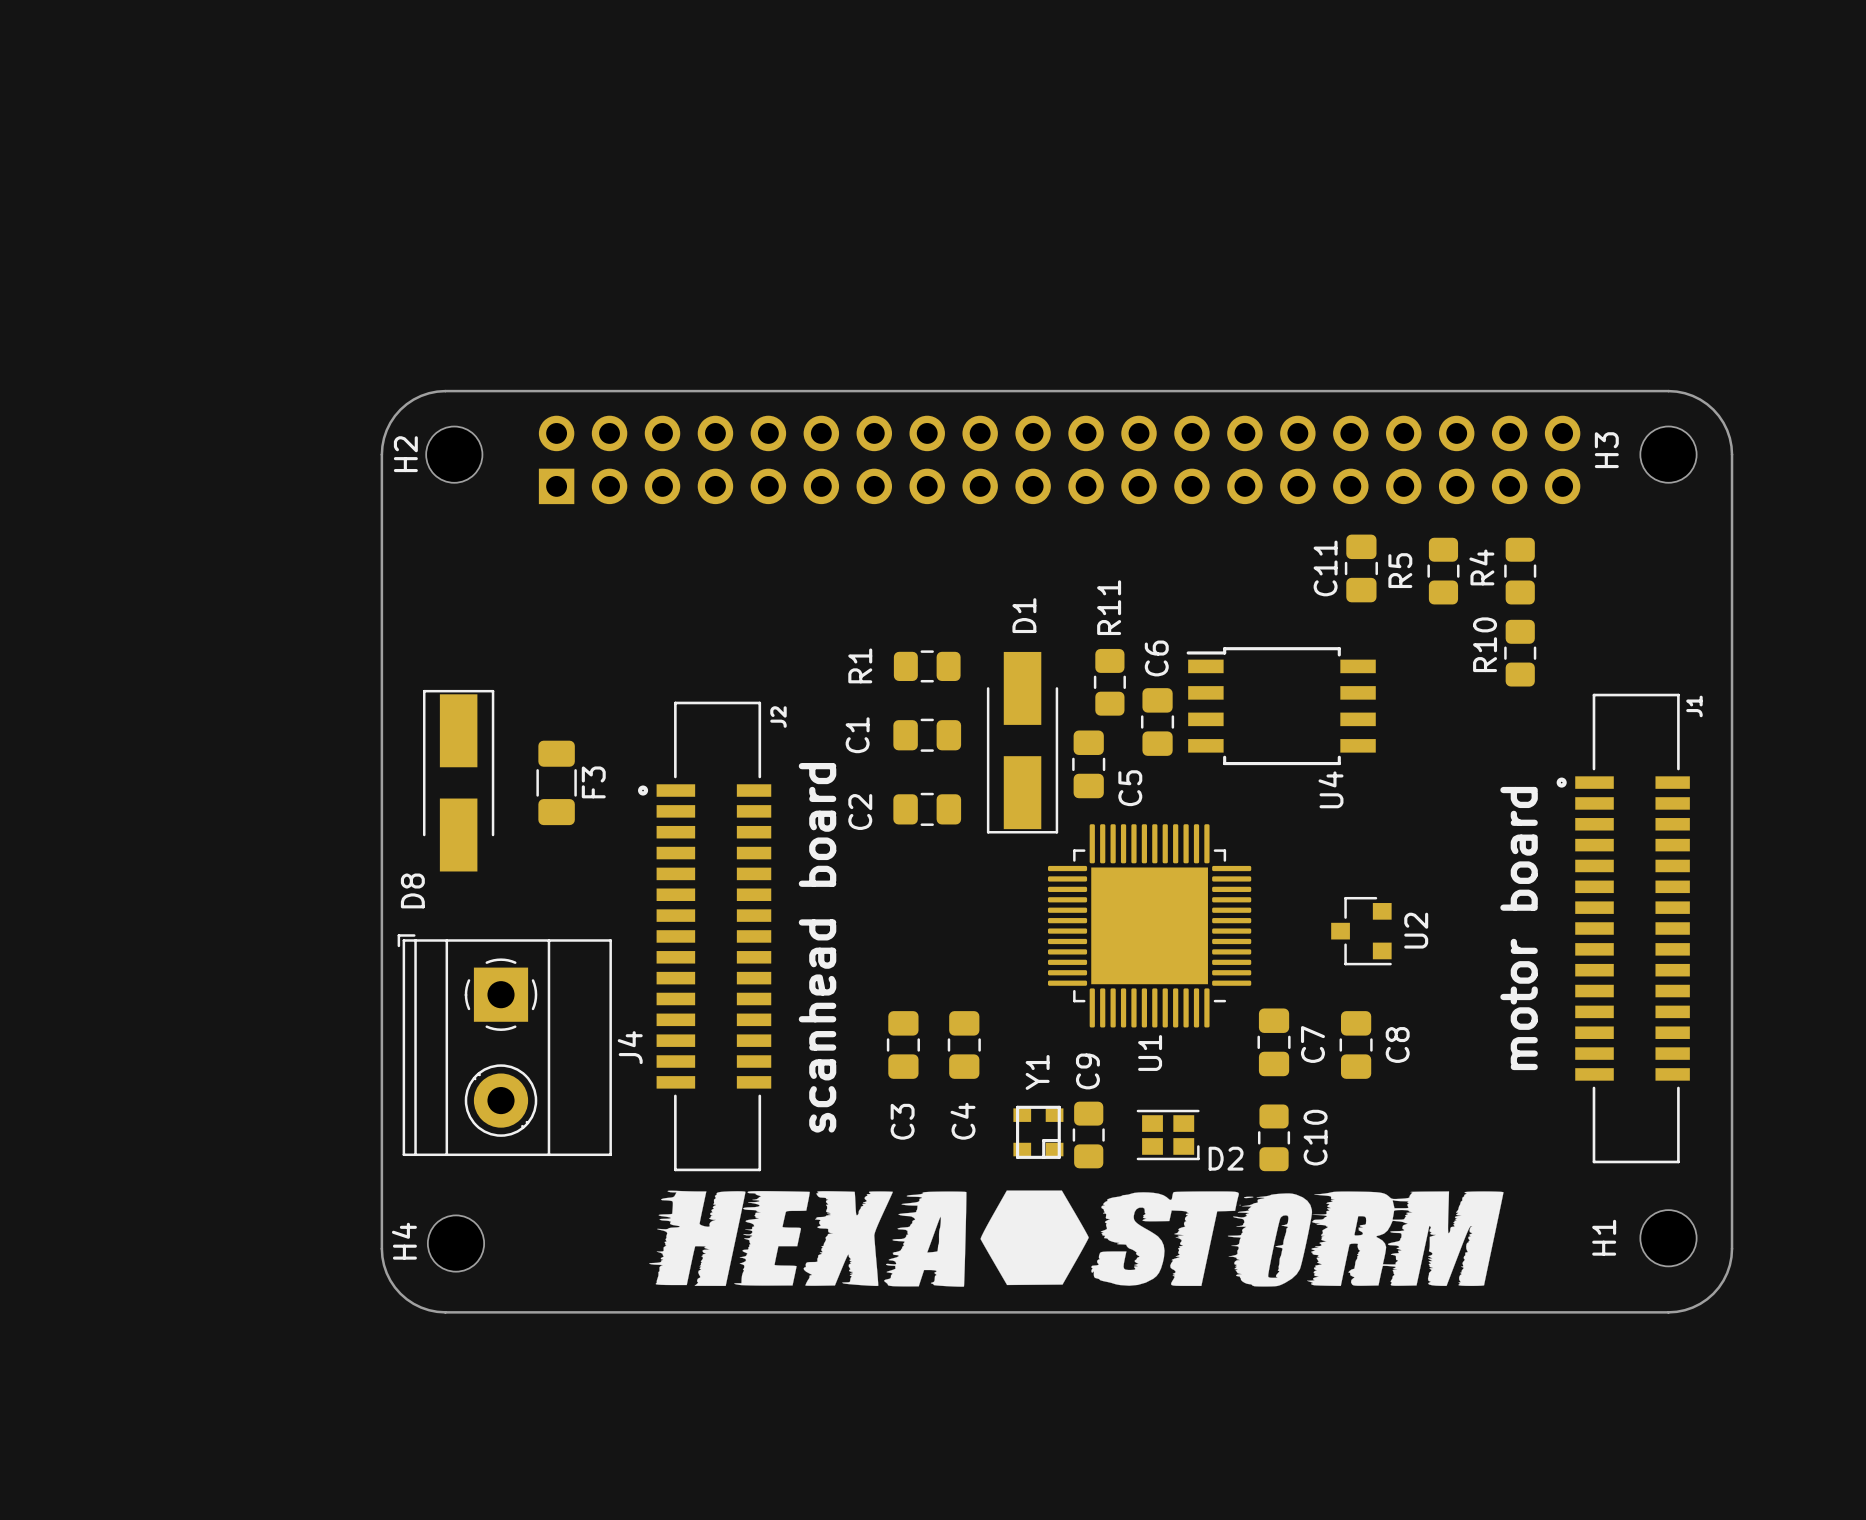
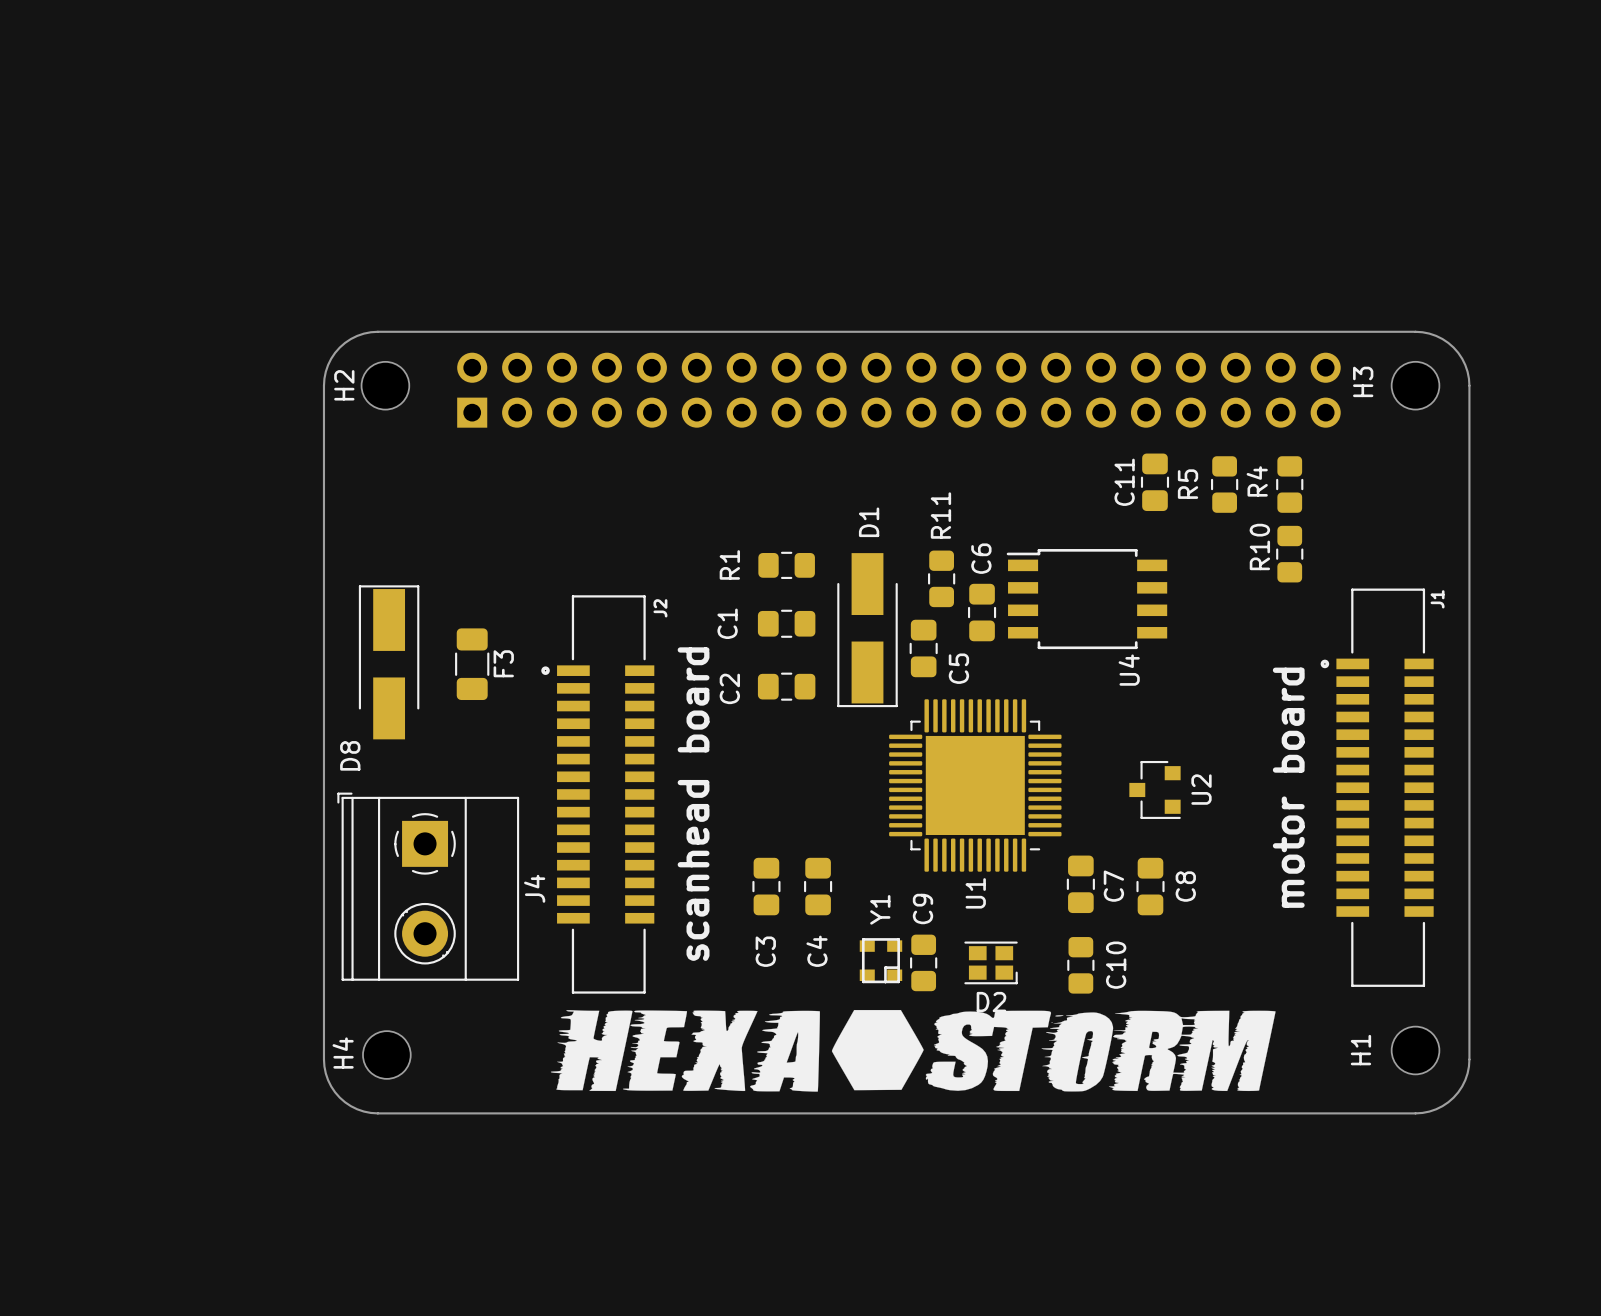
D2 name position: D2 (1226, 1158) -> D2 (991, 1002)

